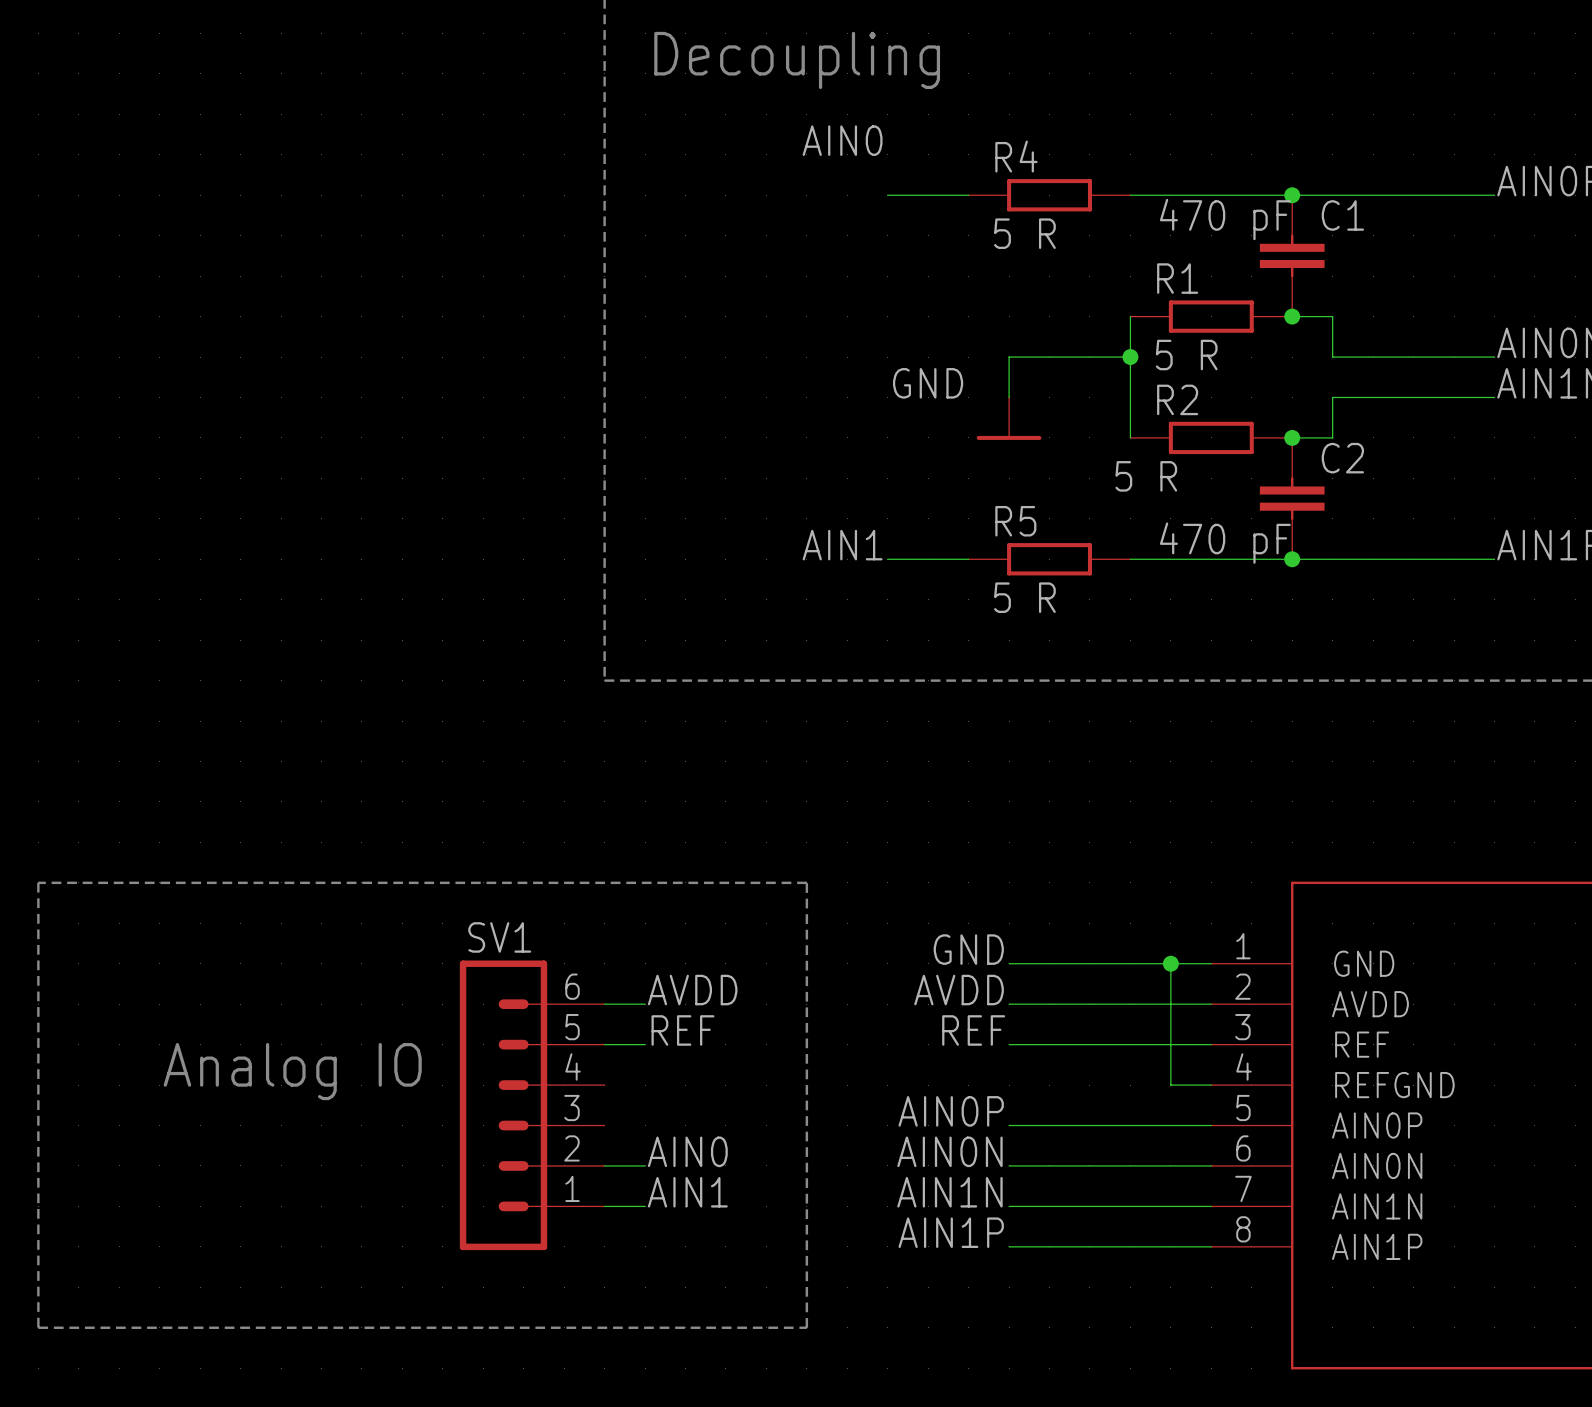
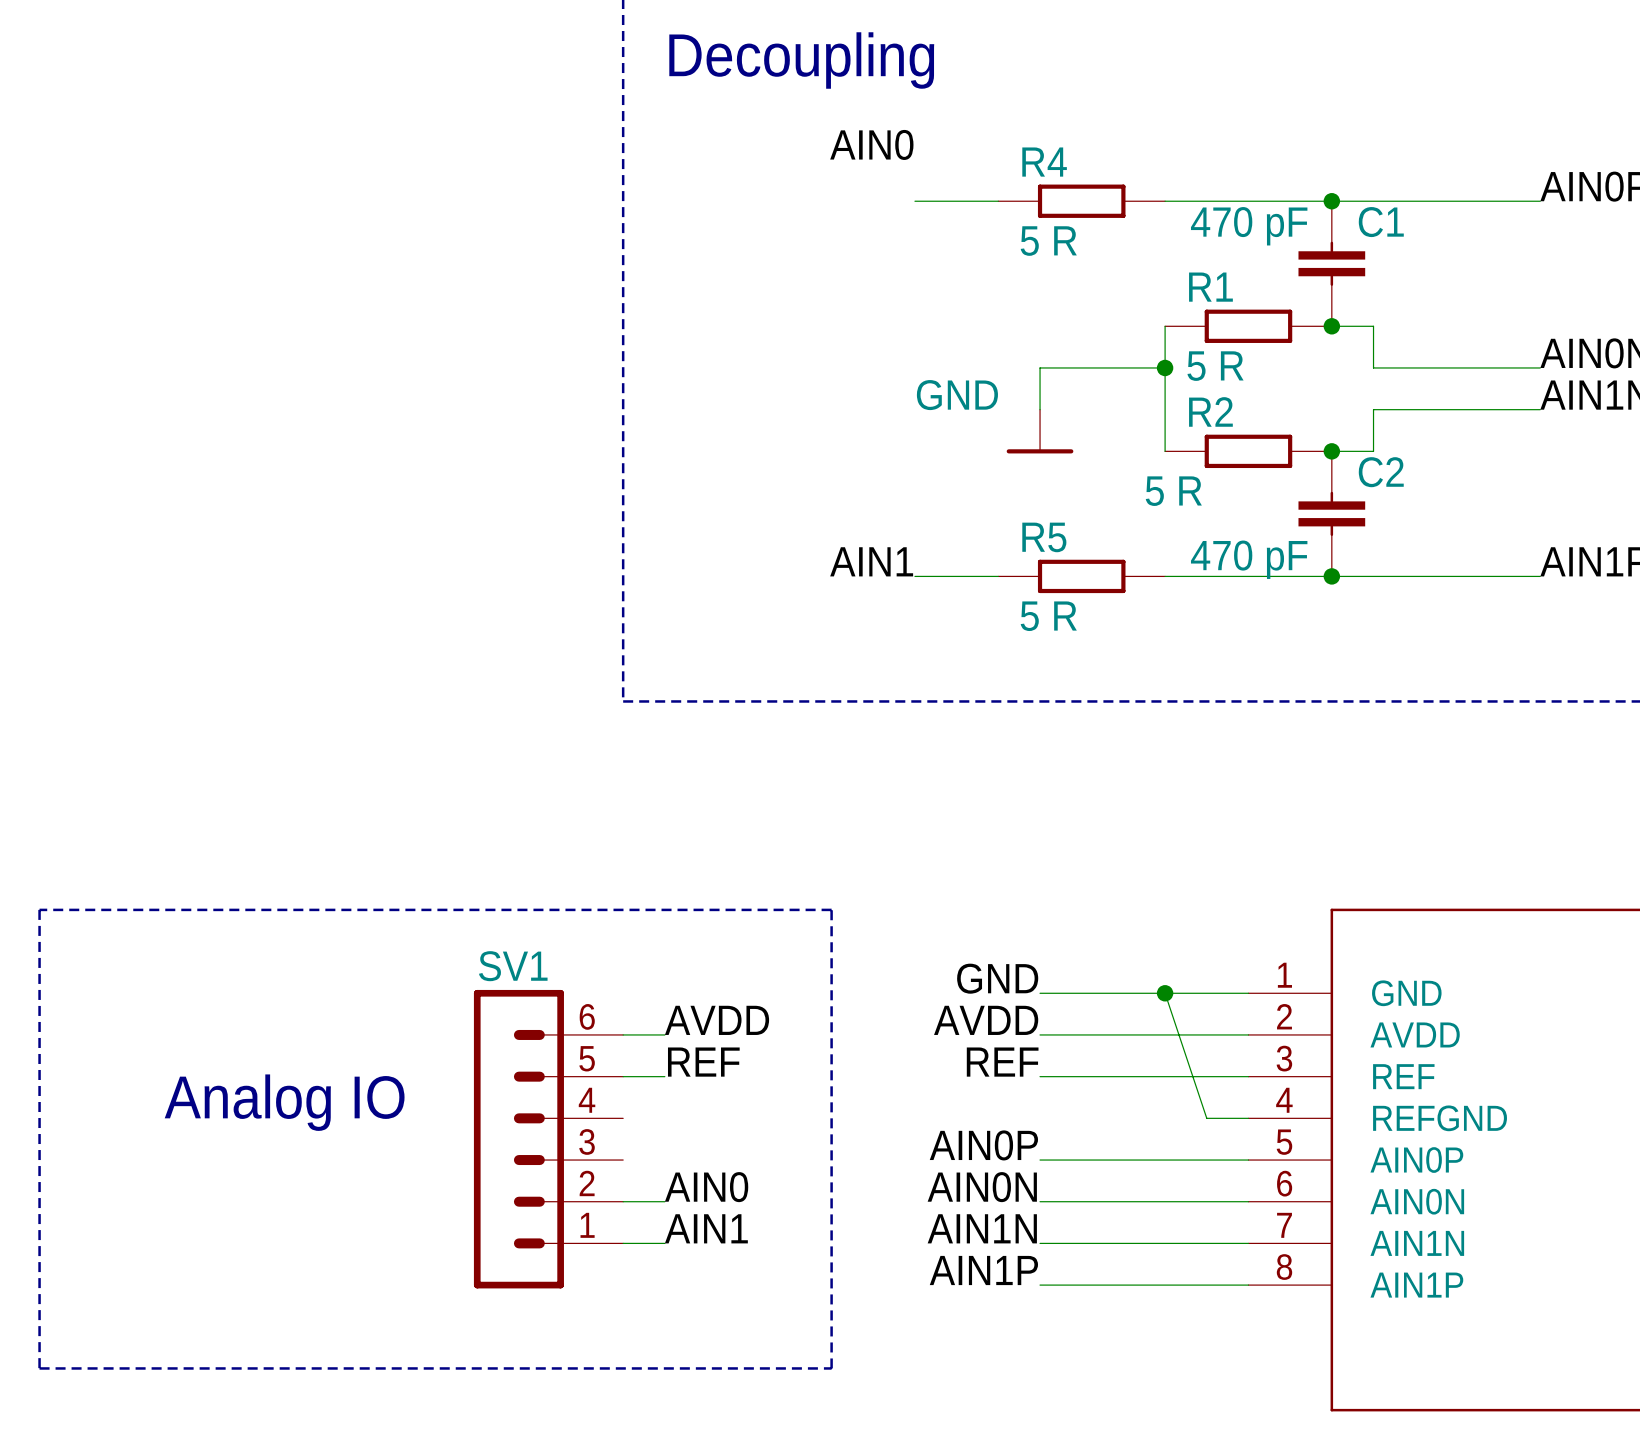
wire: (1170, 963) (1170, 1085) -> (1165, 993) (1206, 1118)
junction position: (1170, 963) -> (1165, 993)

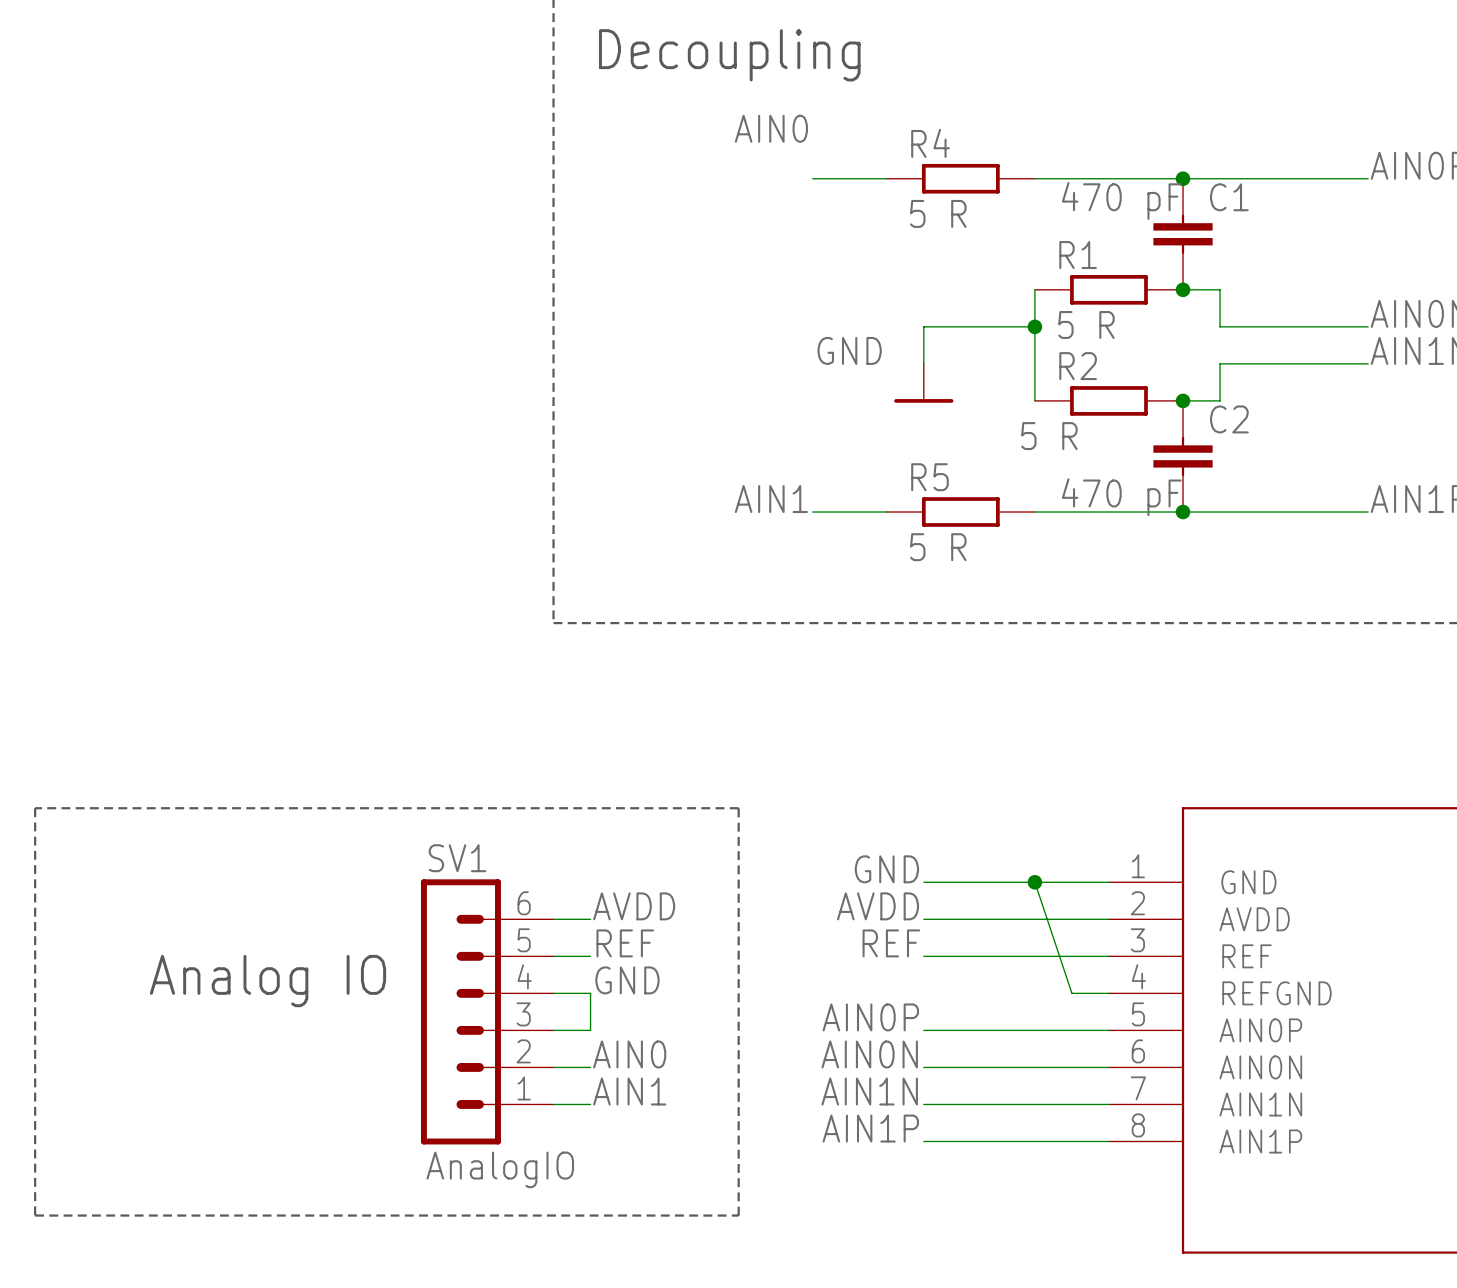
label: none -> GND (627, 980)
wire: none -> (553, 993) (590, 993) (590, 1030) (553, 1030)
SV1 value: none -> AnalogIO (500, 1169)

